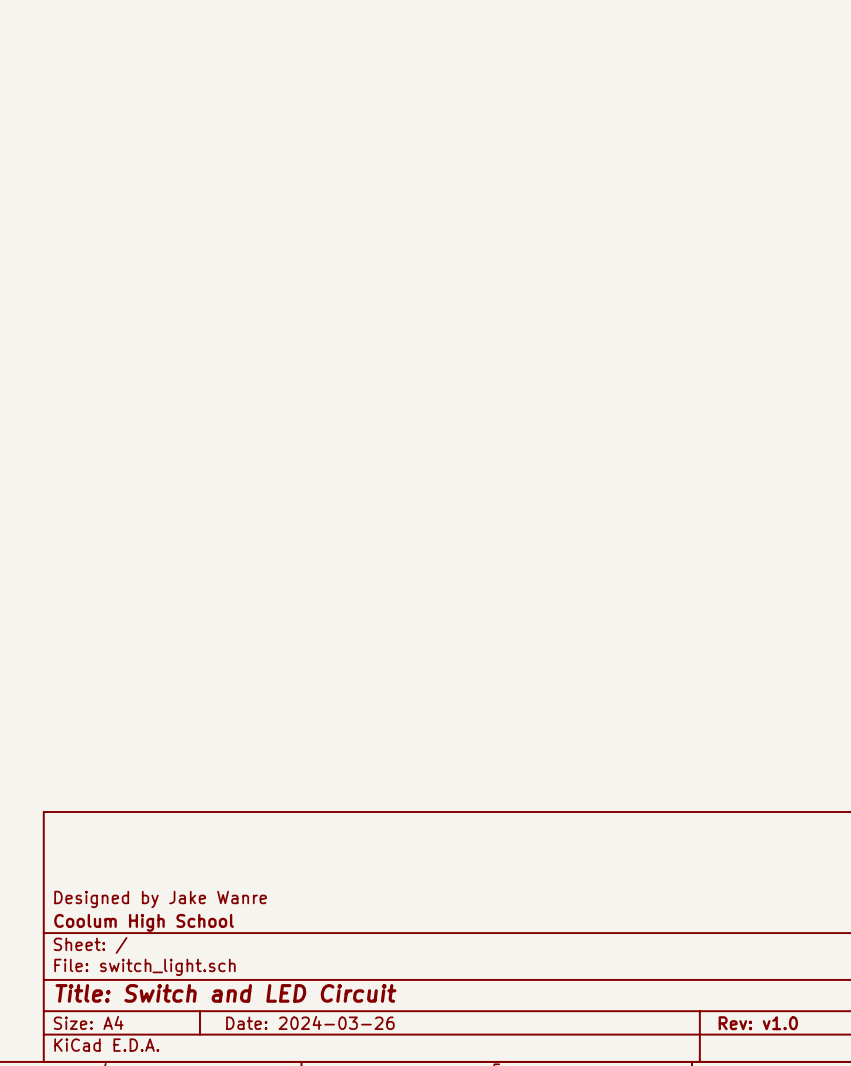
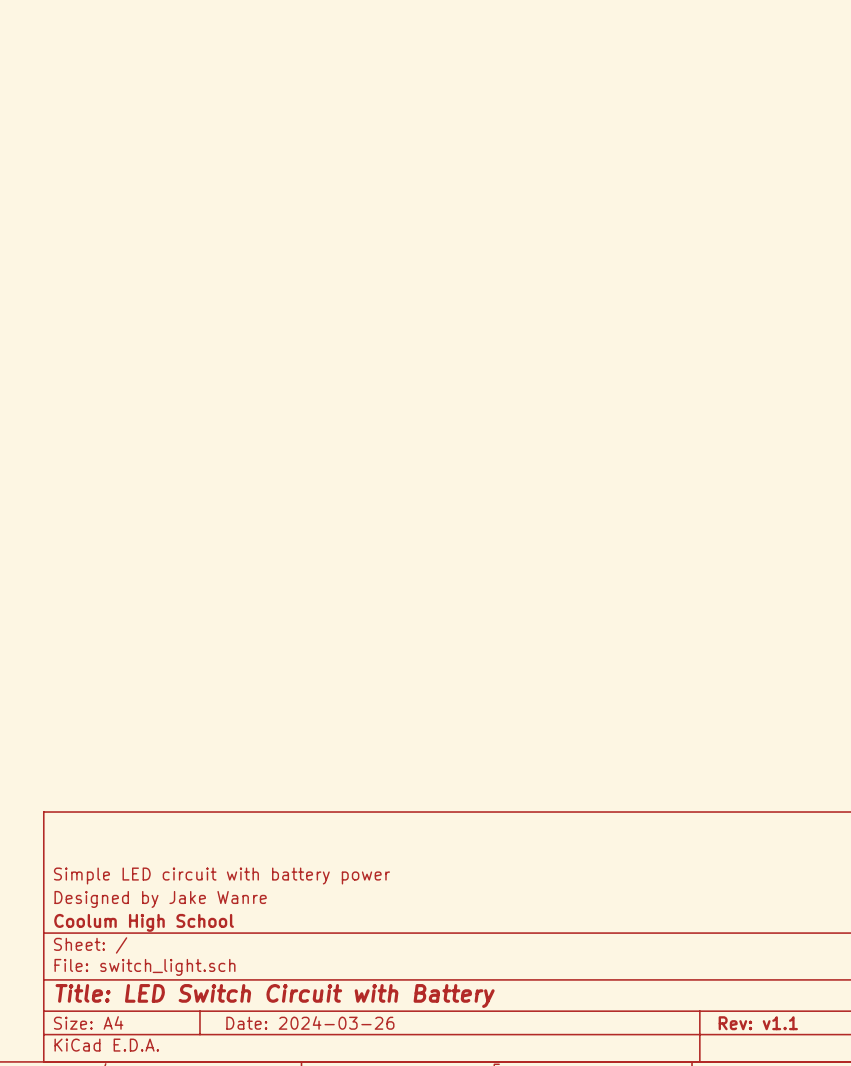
title block: none -> Simple LED circuit with battery power (221, 876)
title block: Title: Switch and LED Circuit (225, 993) -> Title: LED Switch Circuit with Battery (275, 996)
title block: Rev: v1.0 (758, 1023) -> Rev: v1.1 (758, 1023)

